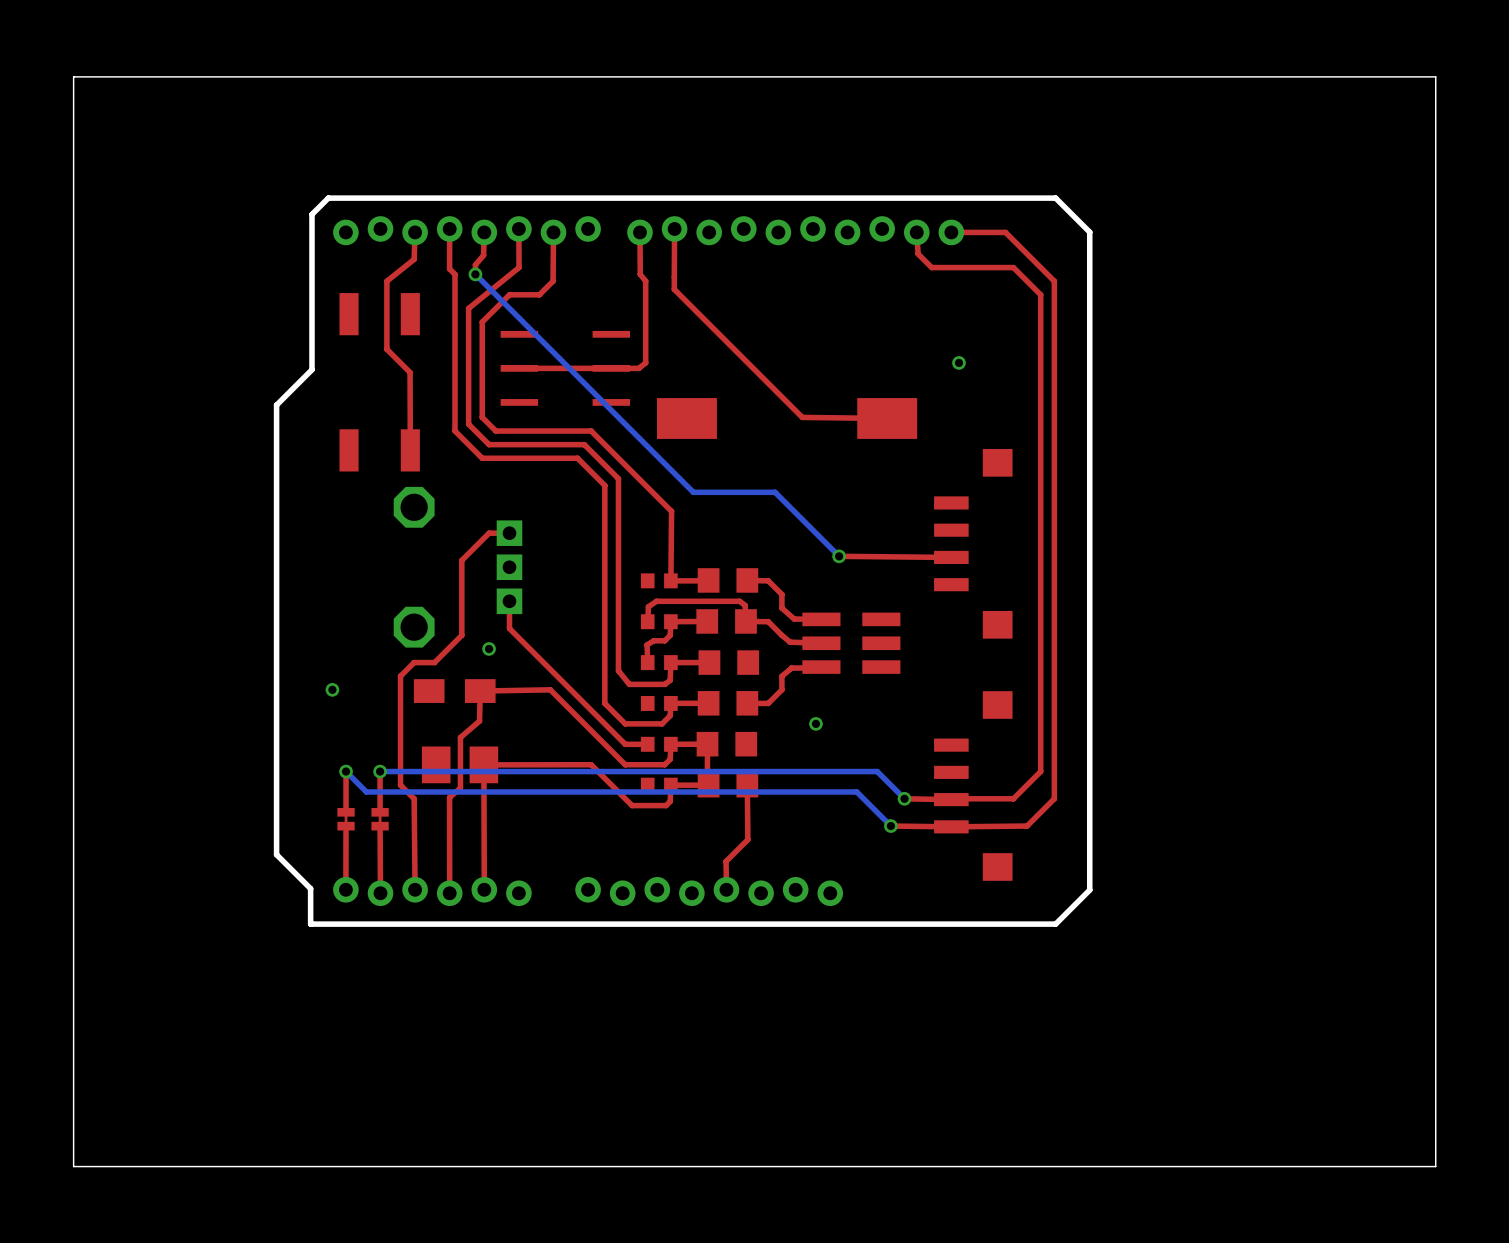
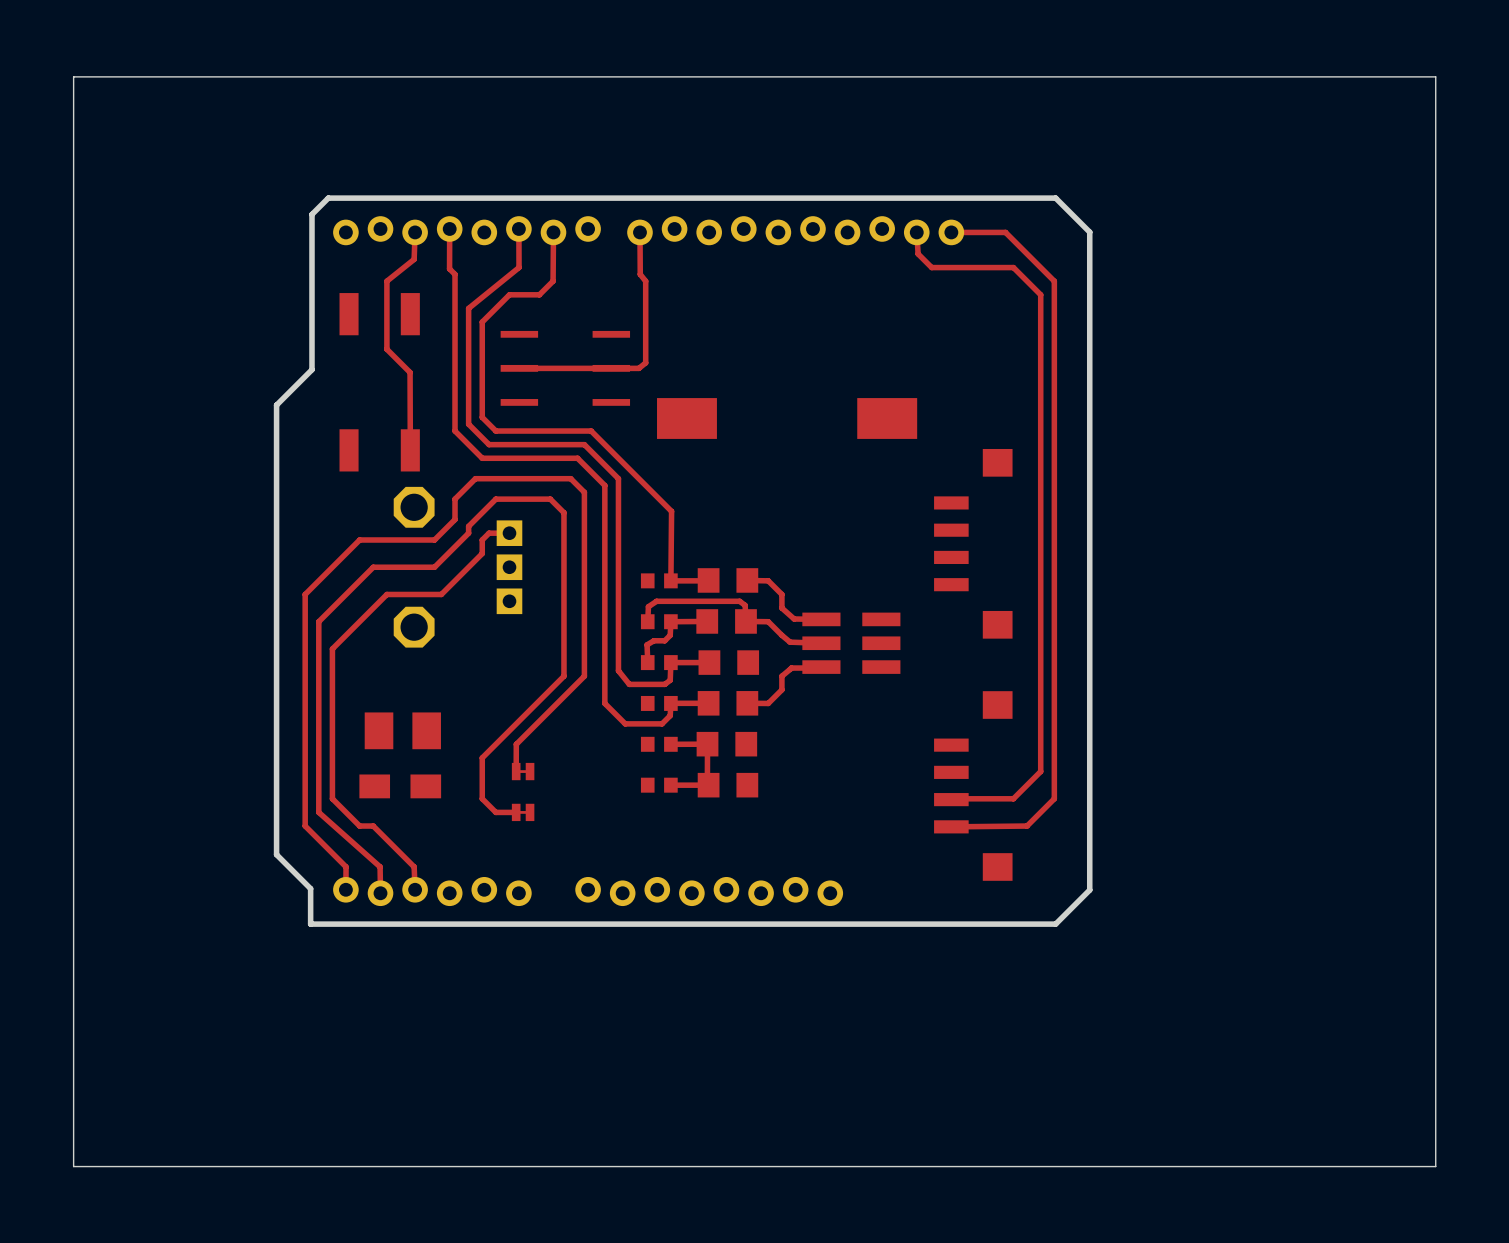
top track: (674, 228) (674, 289) (802, 417) (887, 418) -> none
top track: (484, 232) (483, 255) (475, 264) (475, 274) -> none
bottom track: (475, 274) (693, 492) (775, 492) (839, 556) -> none
via: (475, 274) -> none
via: (958, 362) -> none
top track: (482, 540) (461, 560) (461, 635) (434, 662) (414, 662) (400, 676) (400, 785) (414, 798) (415, 889) -> (482, 540) (482, 553) (441, 594) (386, 594) (332, 648) (332, 798) (359, 826) (373, 826) (414, 866) (415, 889)
top track: (839, 556) (951, 557) -> none
via: (839, 556) -> none
top track: (509, 601) (509, 628) (625, 744) (647, 744) -> none
via: (489, 648) -> none
via: (332, 689) -> none
part position: (454, 691) -> (400, 786)
via: (815, 723) -> none
top track: (670, 744) (670, 759) (664, 764) (625, 764) (550, 689) (480, 691) (479, 721) (460, 737) (460, 787) (449, 797) (449, 893) -> none
part position: (460, 764) -> (402, 730)
top track: (346, 771) (346, 812) -> none
bottom track: (346, 771) (366, 791) (856, 791) (890, 826) -> none
via: (346, 771) -> none
top track: (380, 771) (380, 812) -> none
bottom track: (380, 771) (877, 771) (904, 798) -> none
via: (380, 771) -> none
part: none -> (523, 771)
top track: (670, 785) (670, 801) (666, 805) (632, 805) (591, 764) (483, 764) (484, 889) -> none
top track: (747, 785) (747, 839) (726, 861) (726, 889) -> none
top track: (904, 798) (951, 799) -> none
via: (904, 798) -> none
part: none -> (523, 812)
part: (346, 819) -> none
part: (380, 819) -> none
top track: (346, 826) (345, 889) -> (516, 771) (516, 744) (584, 676) (584, 492) (570, 478) (475, 478) (455, 499) (455, 519) (434, 540) (359, 540) (305, 594) (305, 826) (346, 866) (345, 889)
top track: (380, 826) (380, 893) -> (516, 812) (495, 812) (482, 798) (482, 757) (563, 676) (563, 512) (550, 499) (495, 499) (468, 526) (468, 533) (434, 567) (373, 567) (318, 621) (318, 812) (380, 866) (380, 893)
top track: (890, 826) (951, 826) -> none
via: (890, 826) -> none

